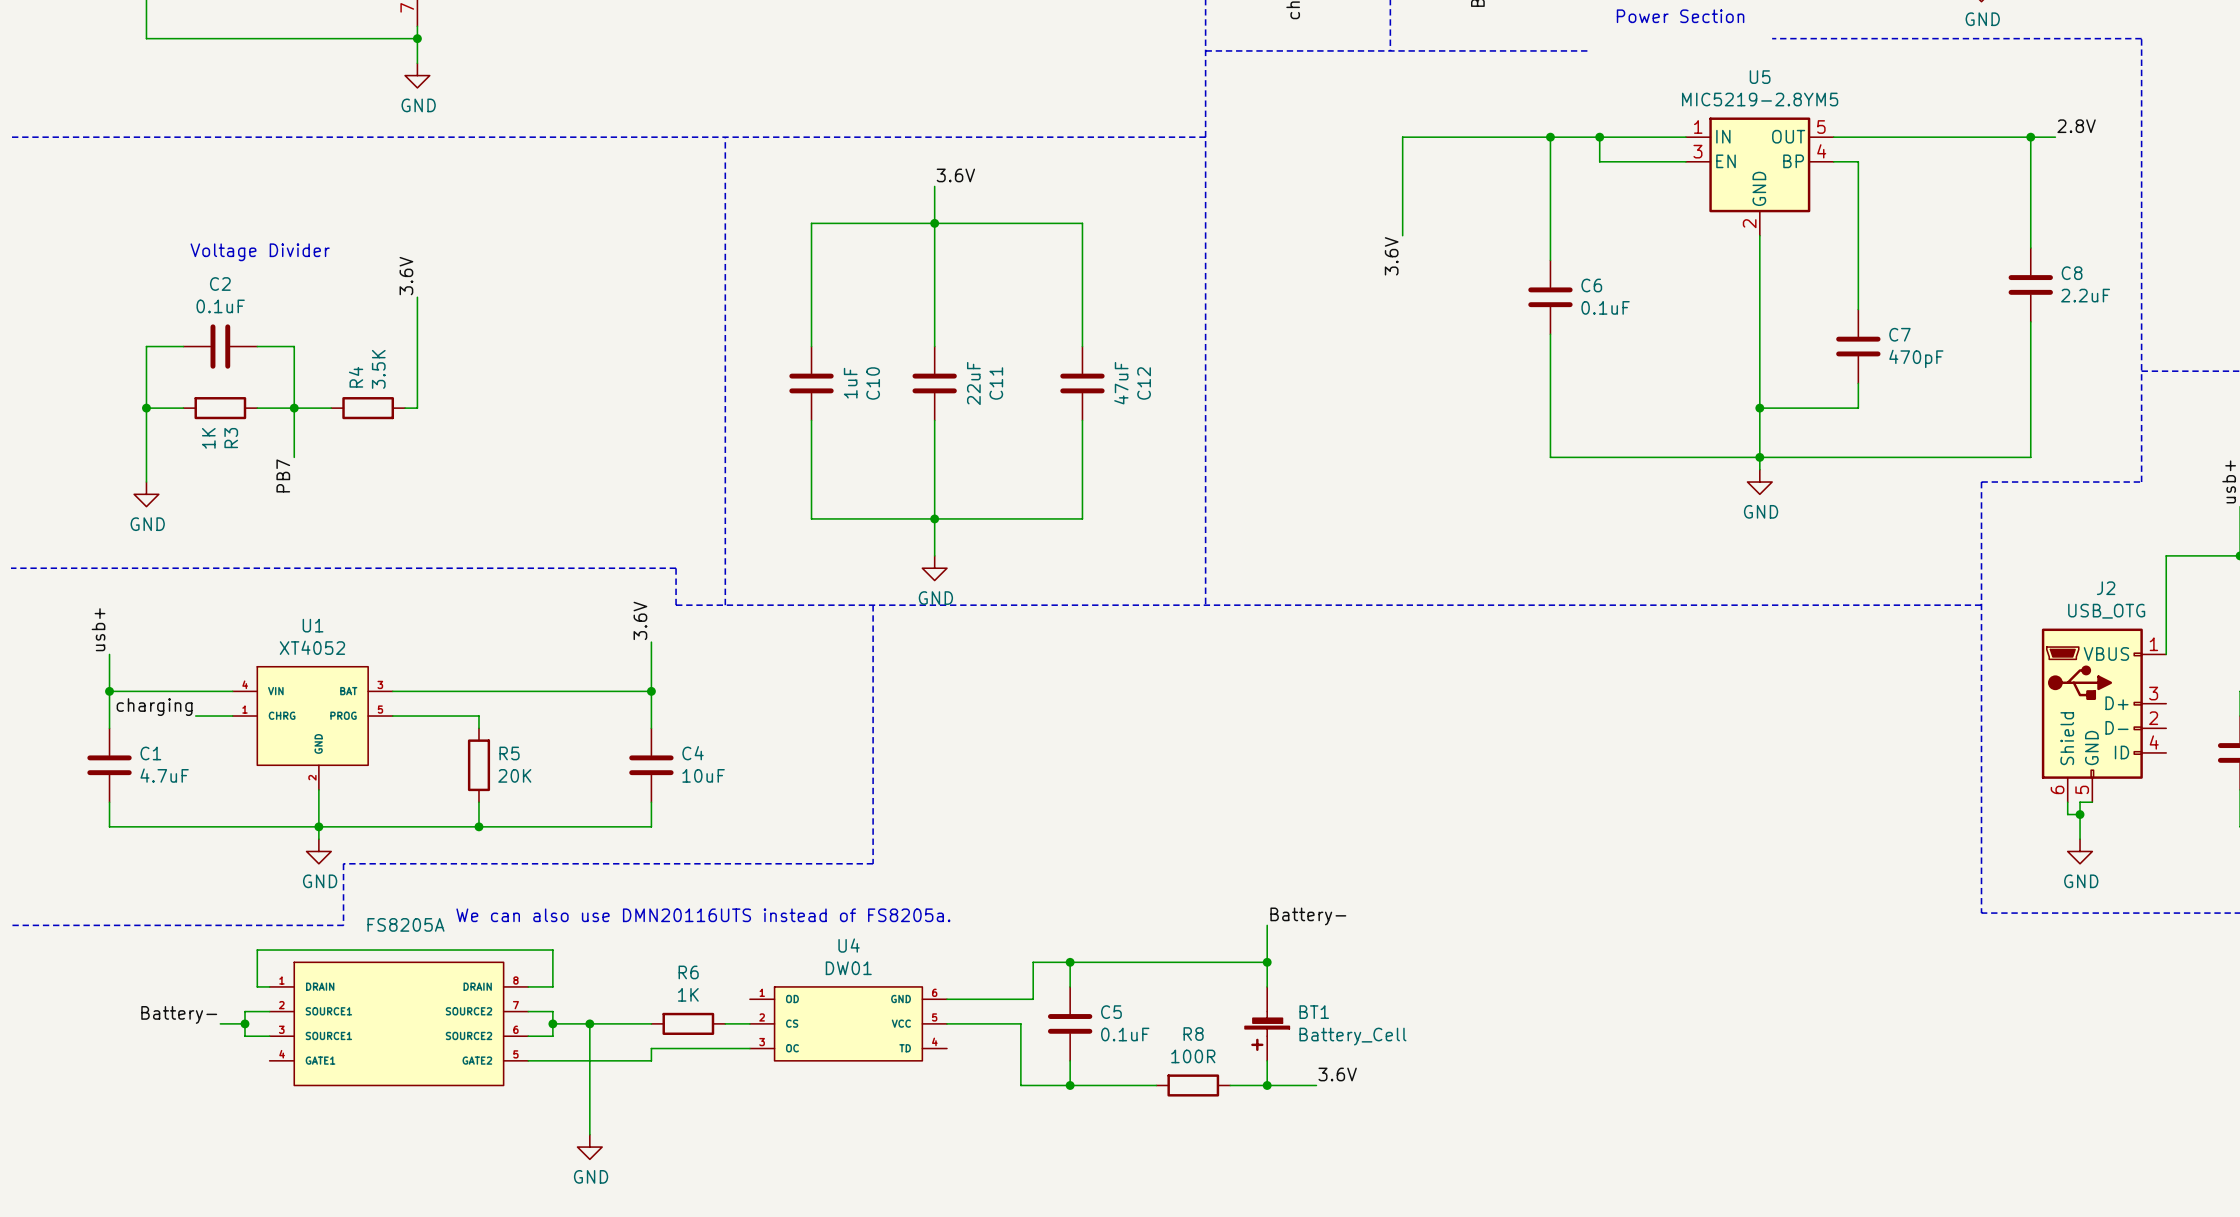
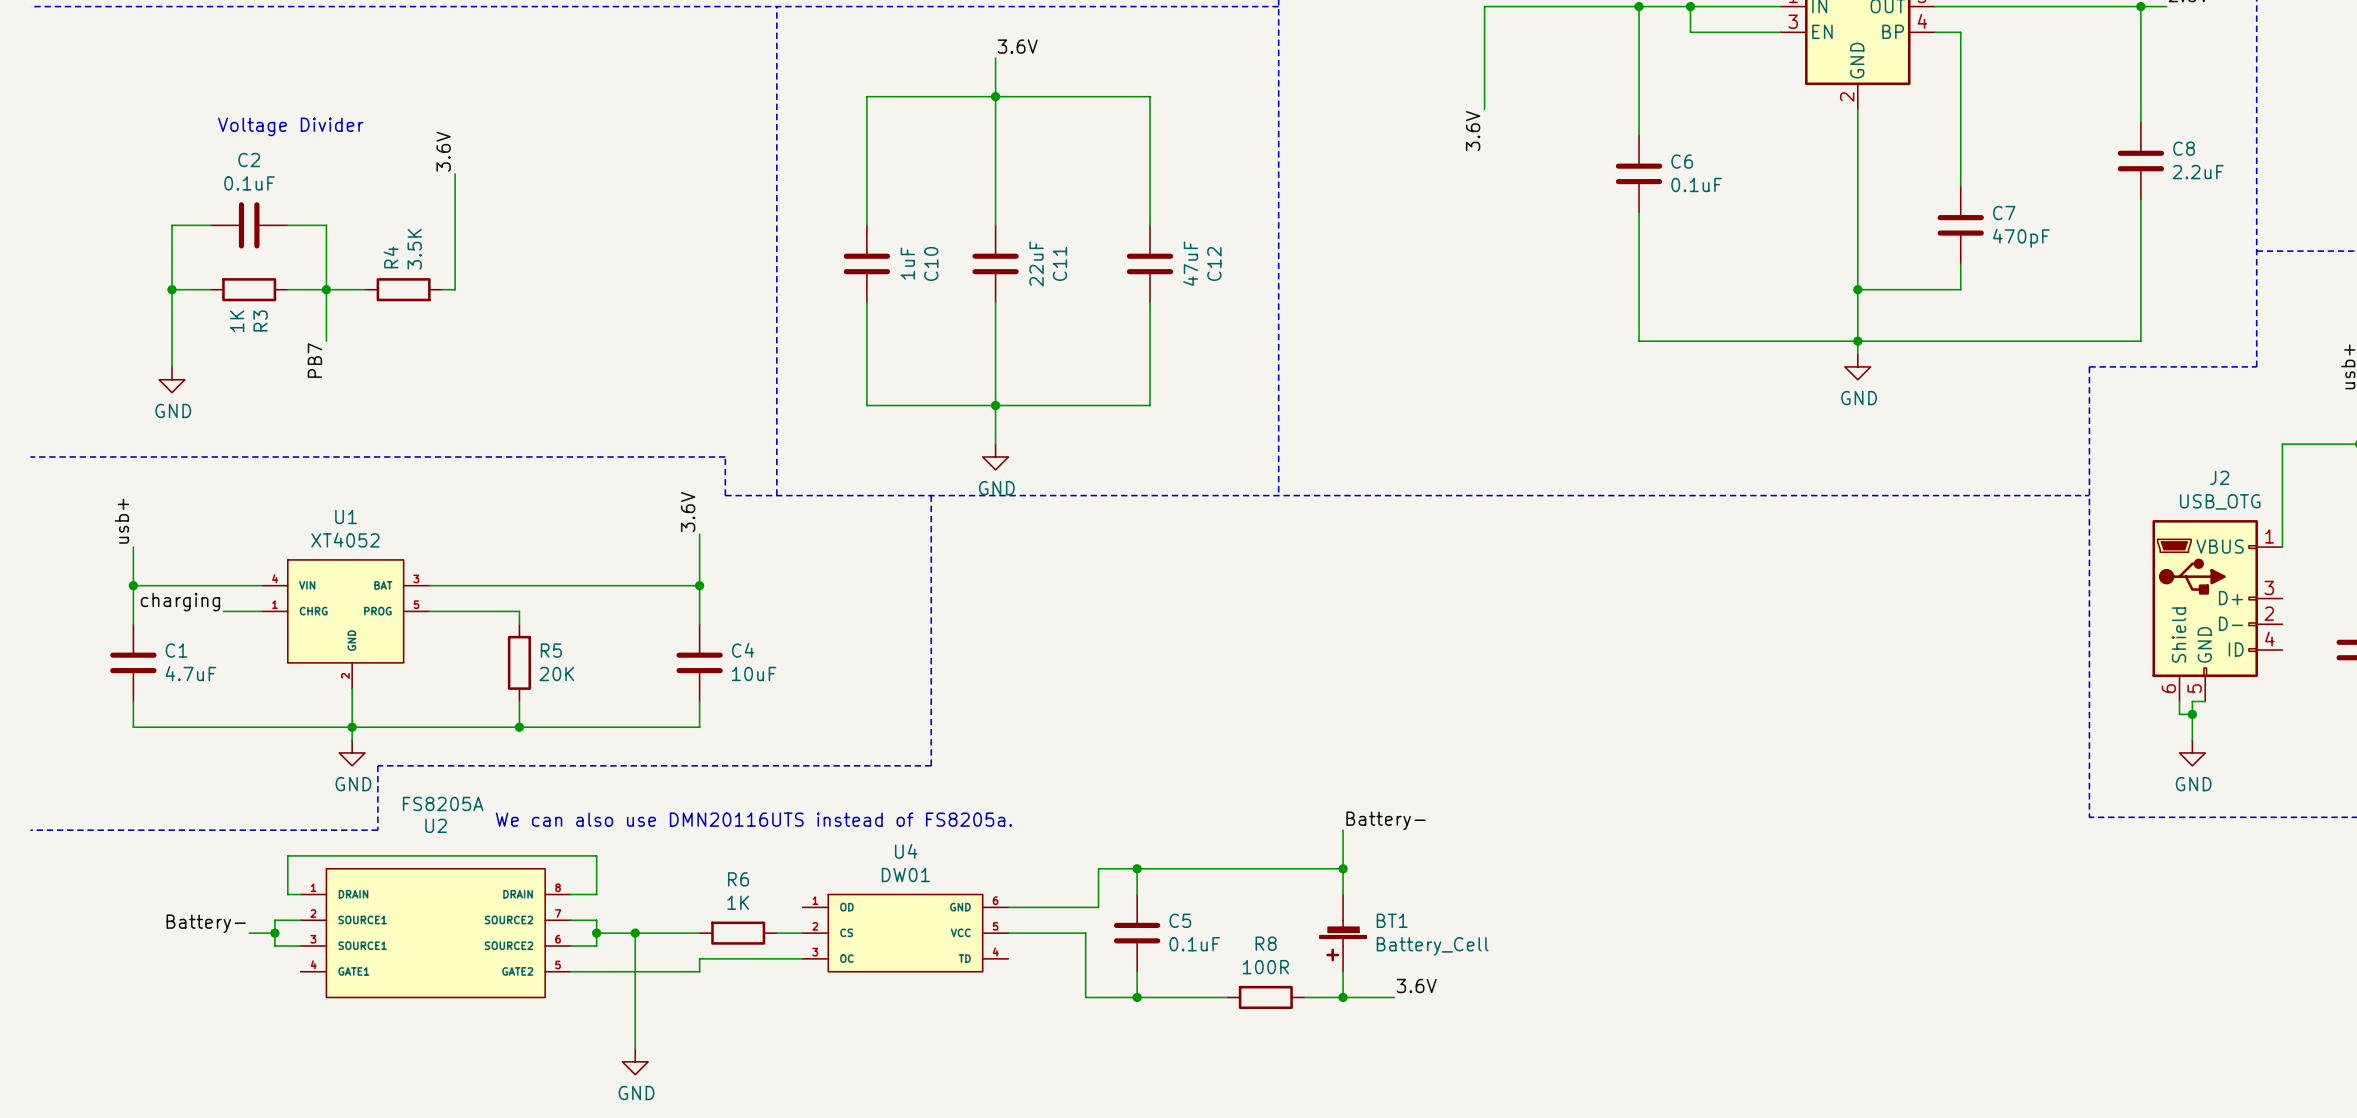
U2 name: none -> U2 (436, 825)
U2 value position: FS8205A (405, 924) -> FS8205A (443, 803)

